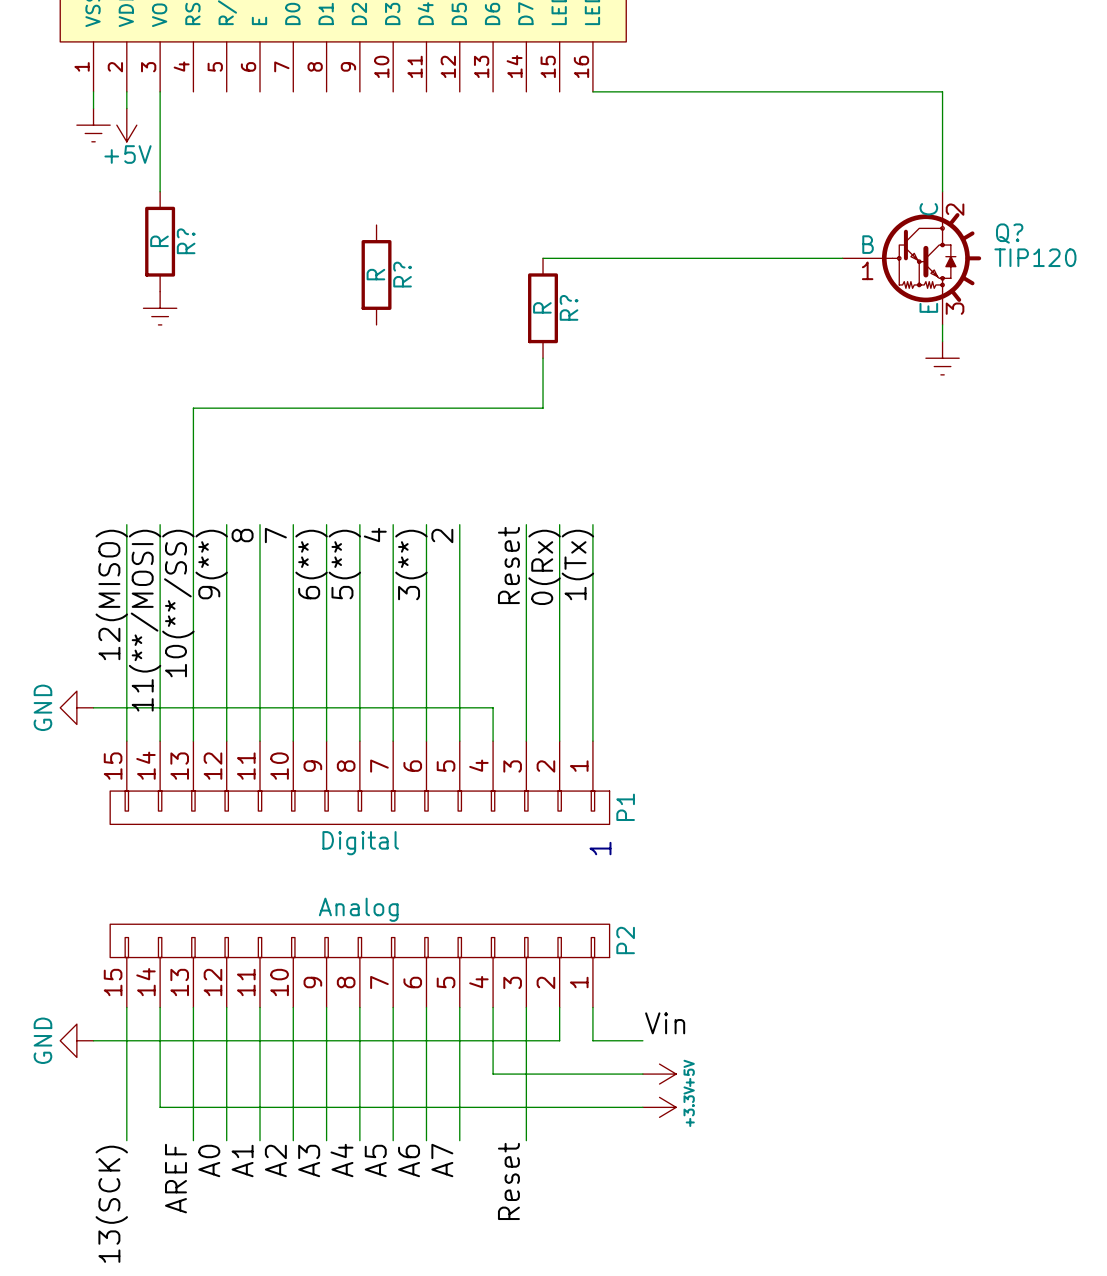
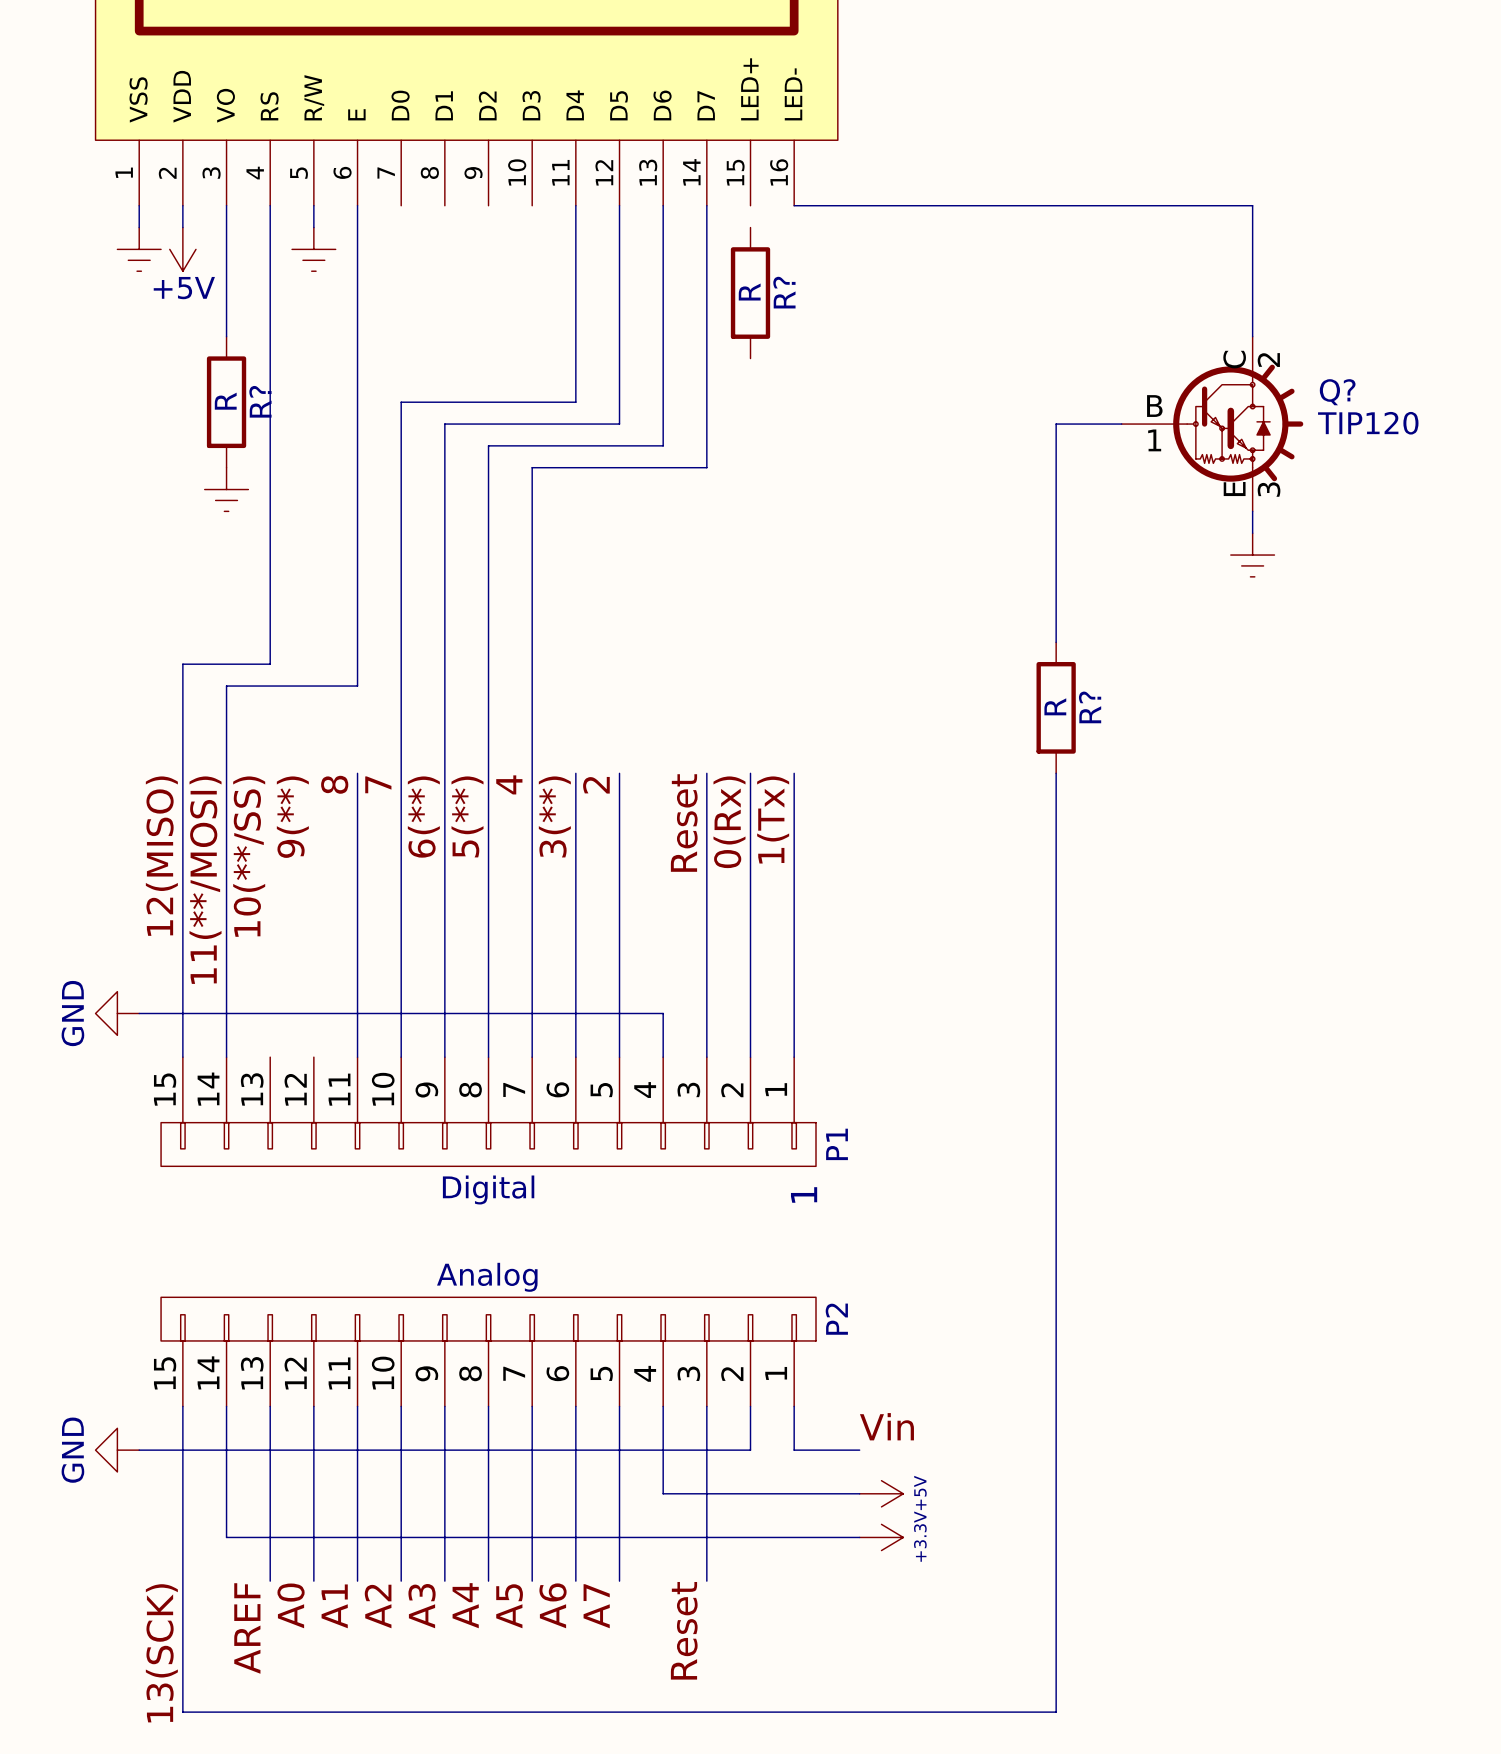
wire: none -> (313, 205) (313, 227)
wire: none -> (357, 205) (357, 686) (226, 686) (226, 773)
wire: none -> (575, 205) (575, 402) (401, 402) (401, 773)
wire: none -> (619, 205) (619, 424) (444, 424) (444, 773)
wire: none -> (663, 205) (663, 445) (488, 445) (488, 773)
wire: none -> (706, 205) (706, 467) (532, 467) (532, 773)
power symbol: none -> (313, 249)
R?: none -> R (750, 293)
wire: (543, 258) (792, 258) -> (1056, 642) (1056, 424)
R?: R (376, 274) -> none
R?: R (543, 308) -> none
wire: (543, 358) (543, 408) (193, 408) -> (270, 205) (270, 620)
wire: (193, 441) (193, 741) -> (270, 664) (182, 664) (182, 773)
R?: none -> R (1056, 707)
wire: (226, 524) (226, 741) -> none
wire: none -> (1056, 773) (1056, 1712) (182, 1712) (182, 1581)

